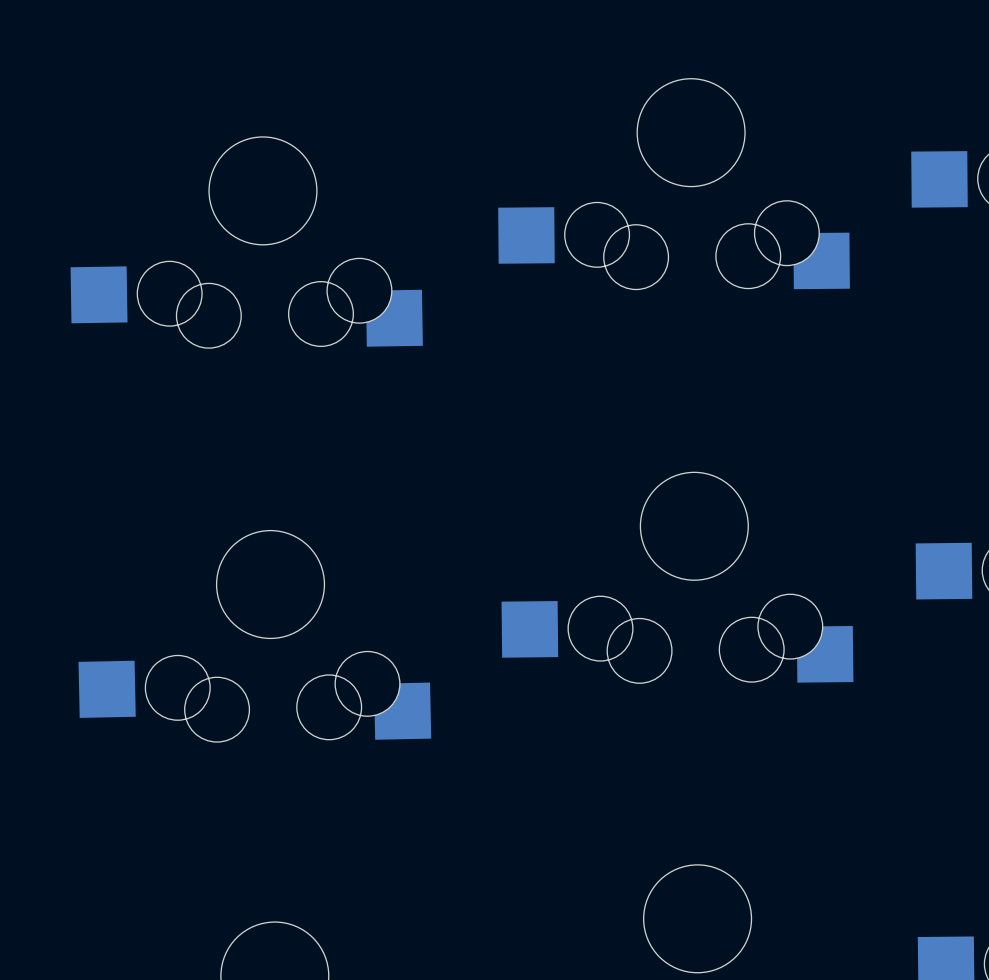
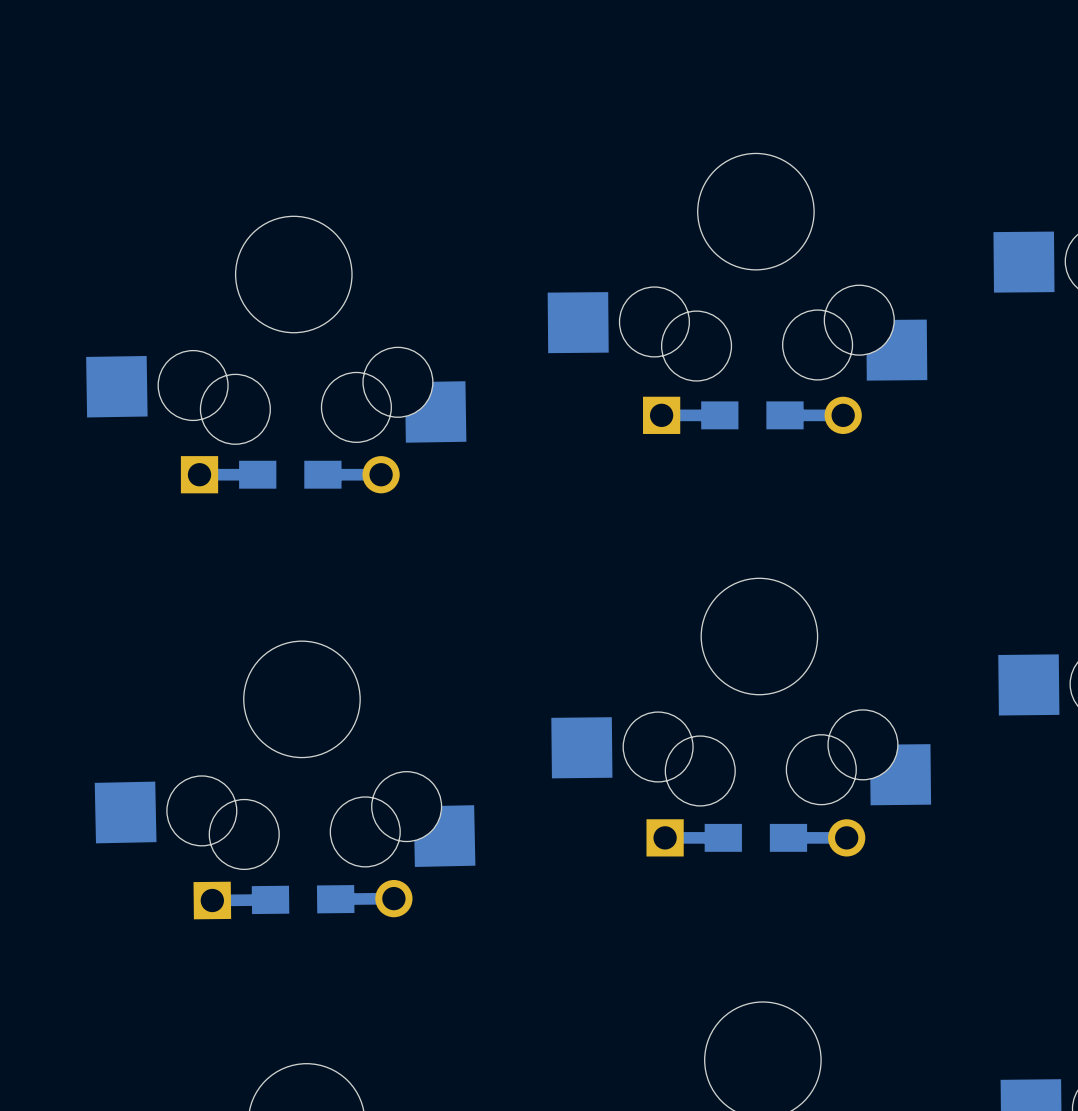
part: none -> (752, 415)
part: none -> (290, 474)
part: none -> (755, 837)
part: none -> (303, 899)

